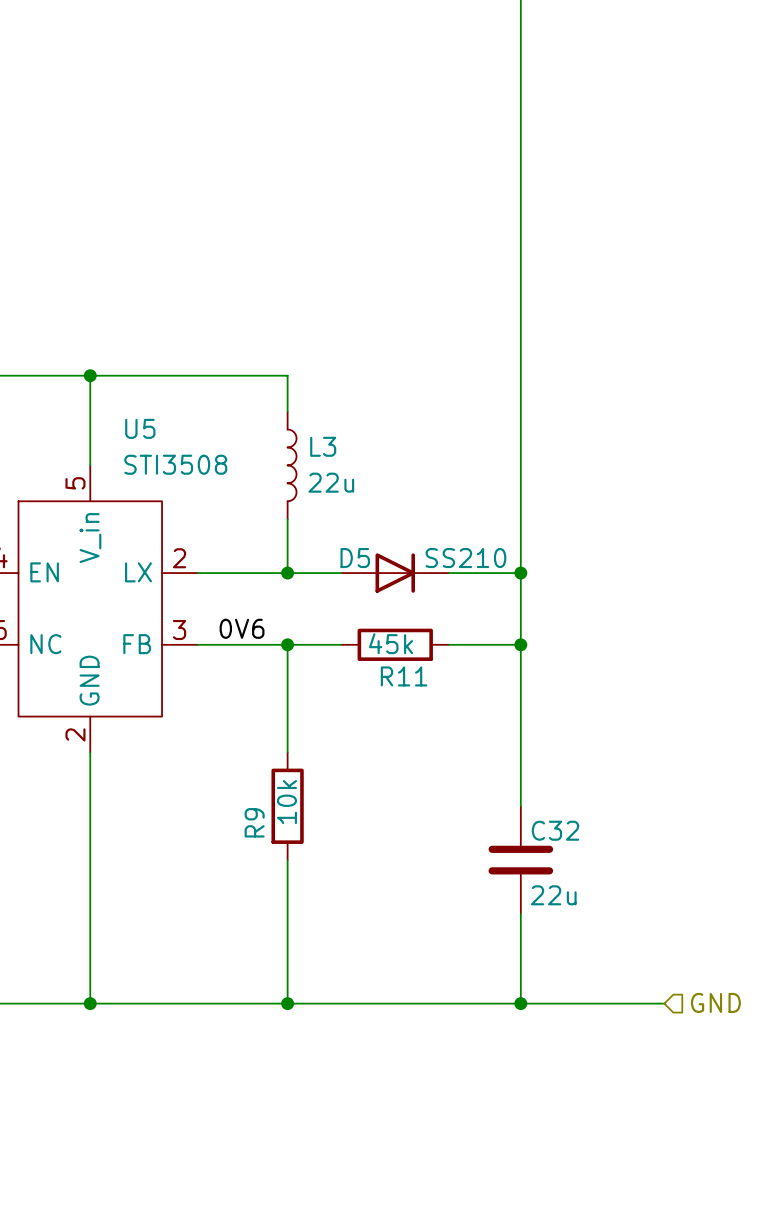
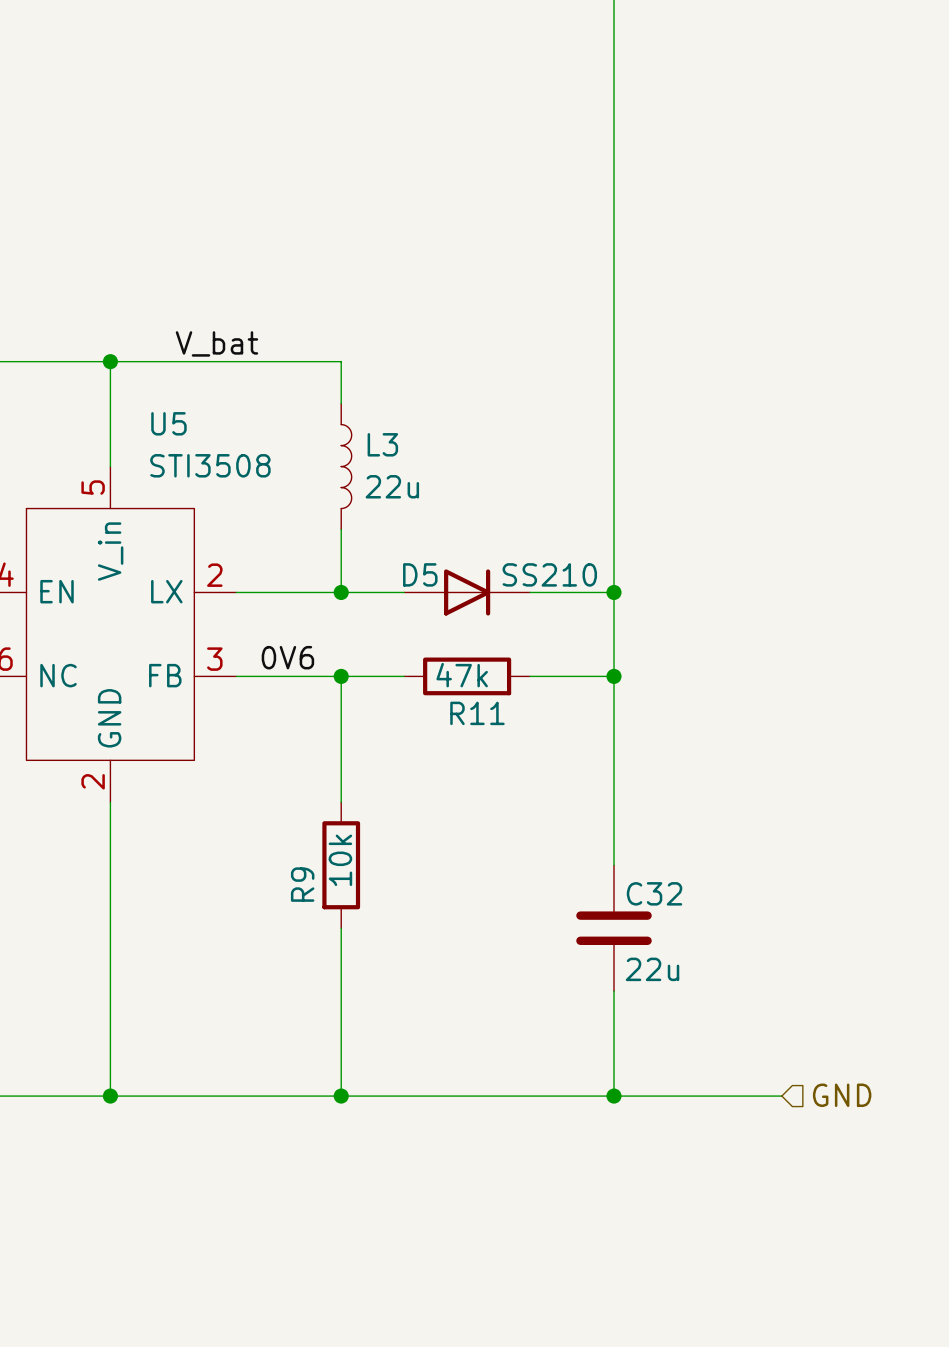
label: none -> V_bat (216, 343)
R11 value: 45k (391, 643) -> 47k (462, 675)

